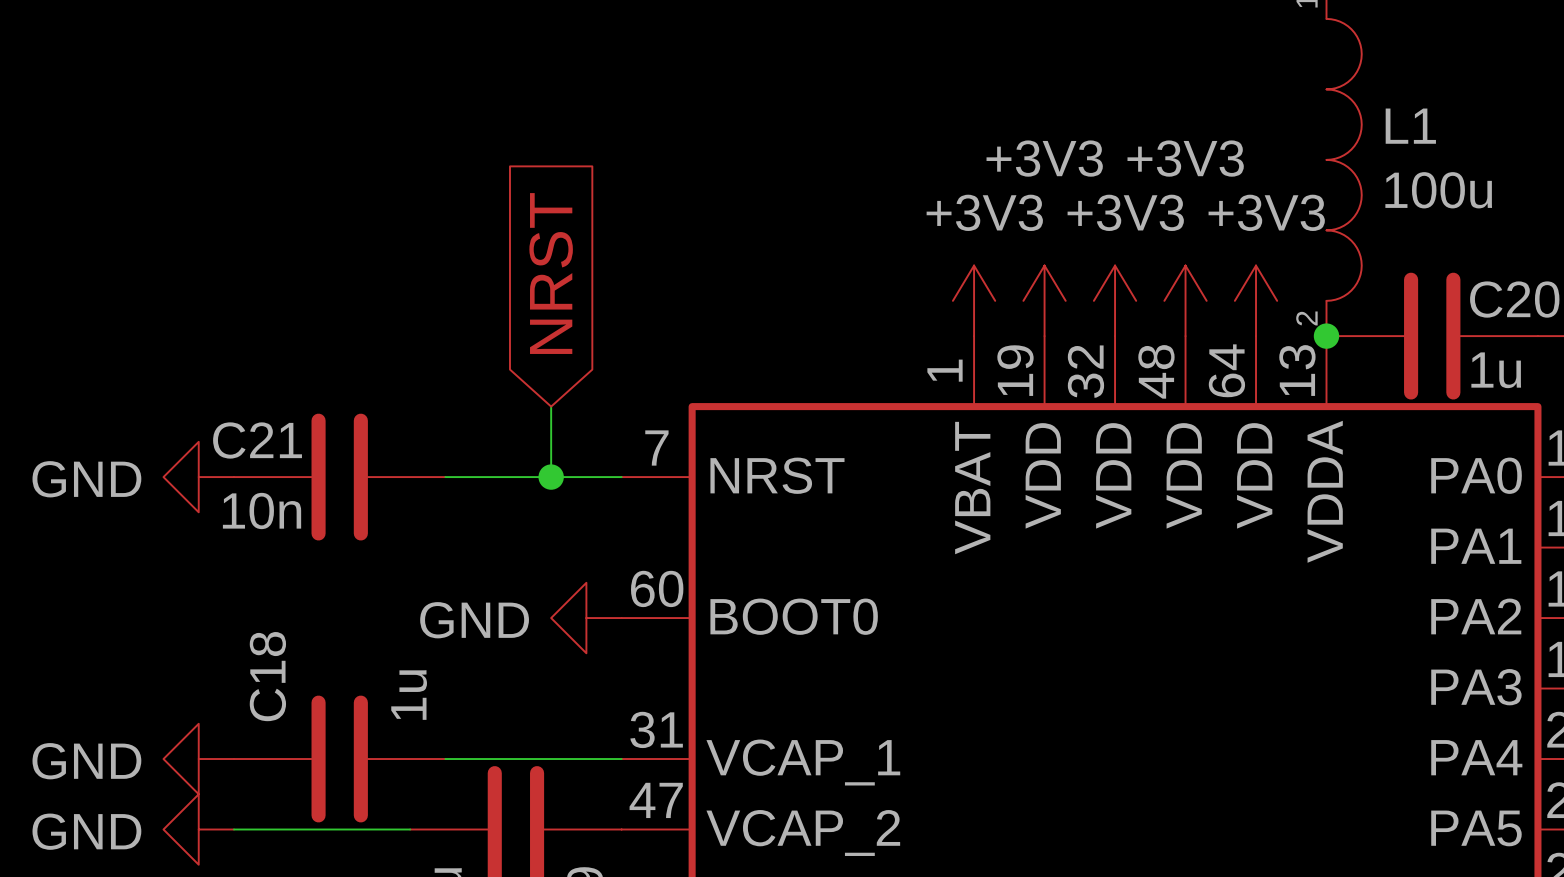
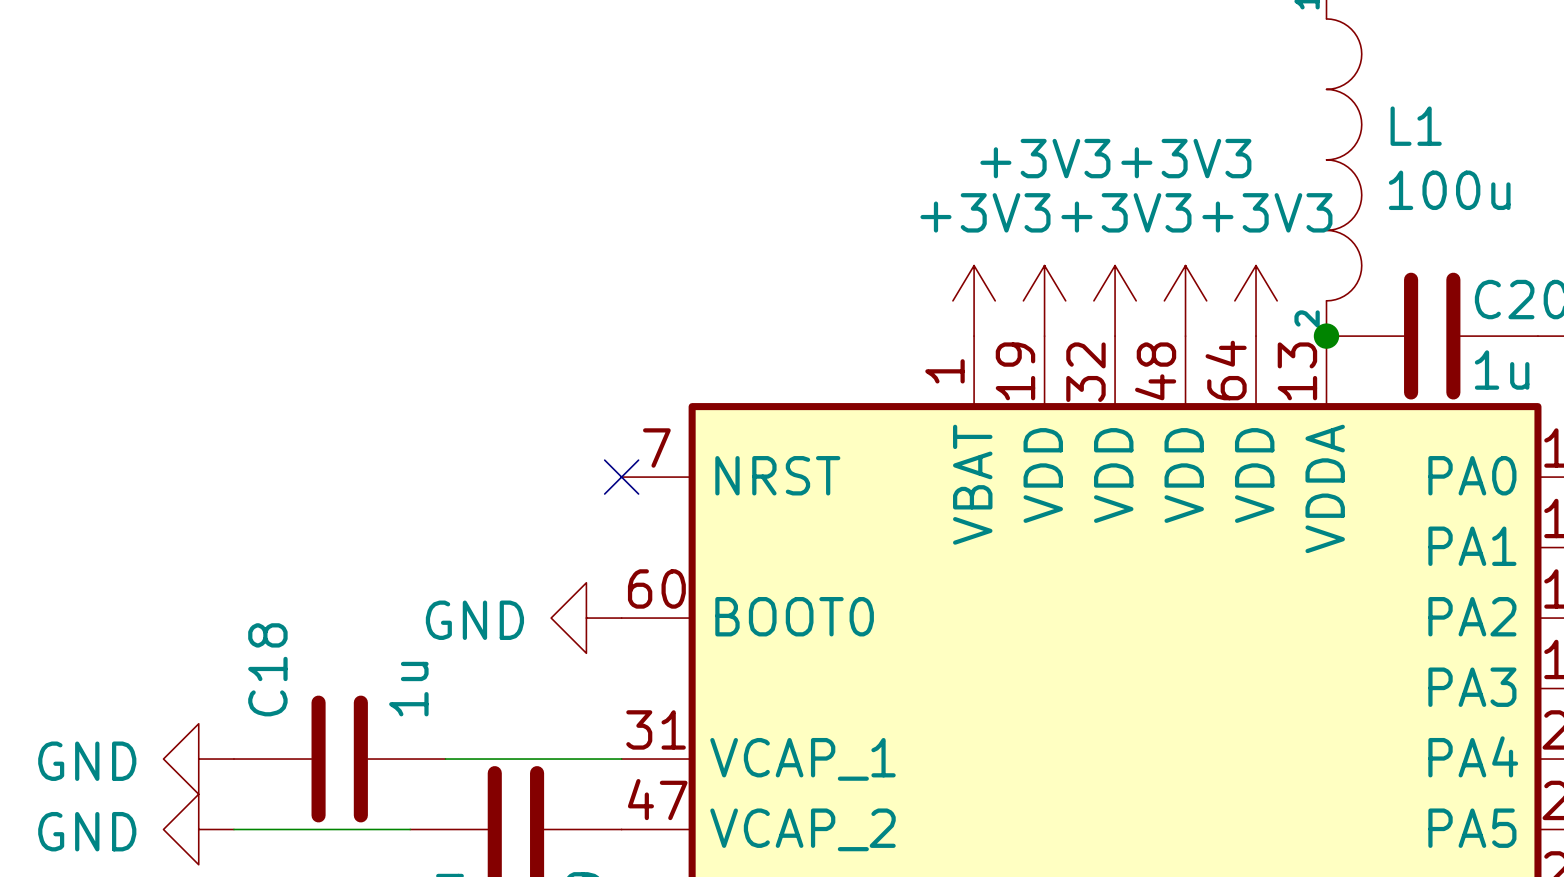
global label: NRST (551, 273) -> none
wire: (551, 406) (551, 477) -> none
power symbol: GND (198, 477) -> none
C21: 10n (339, 477) -> none
wire: (445, 477) (621, 477) -> none
junction: (551, 477) -> none
no-connect mark: none -> (621, 477)

